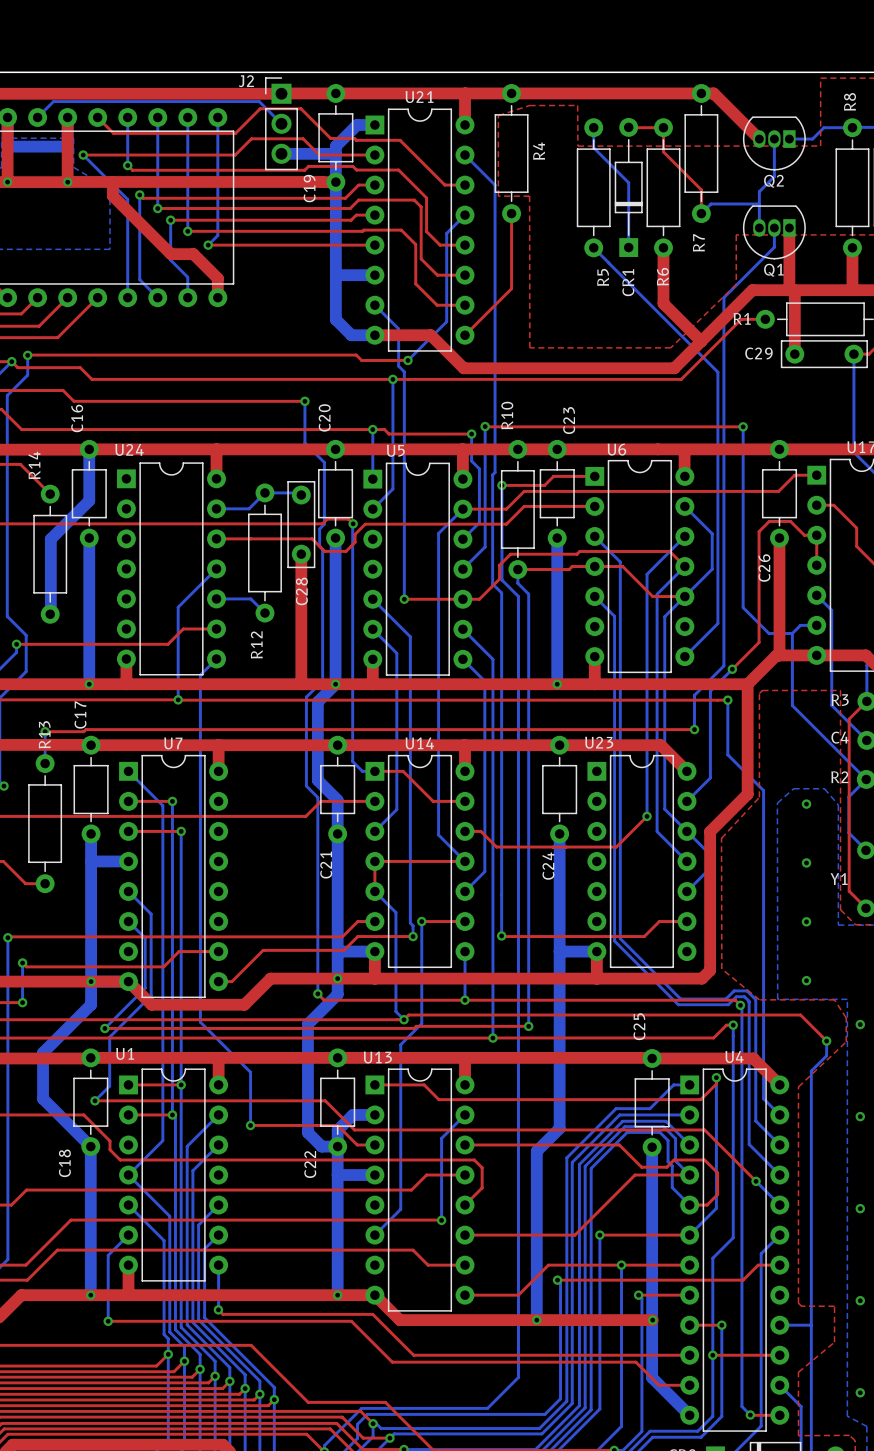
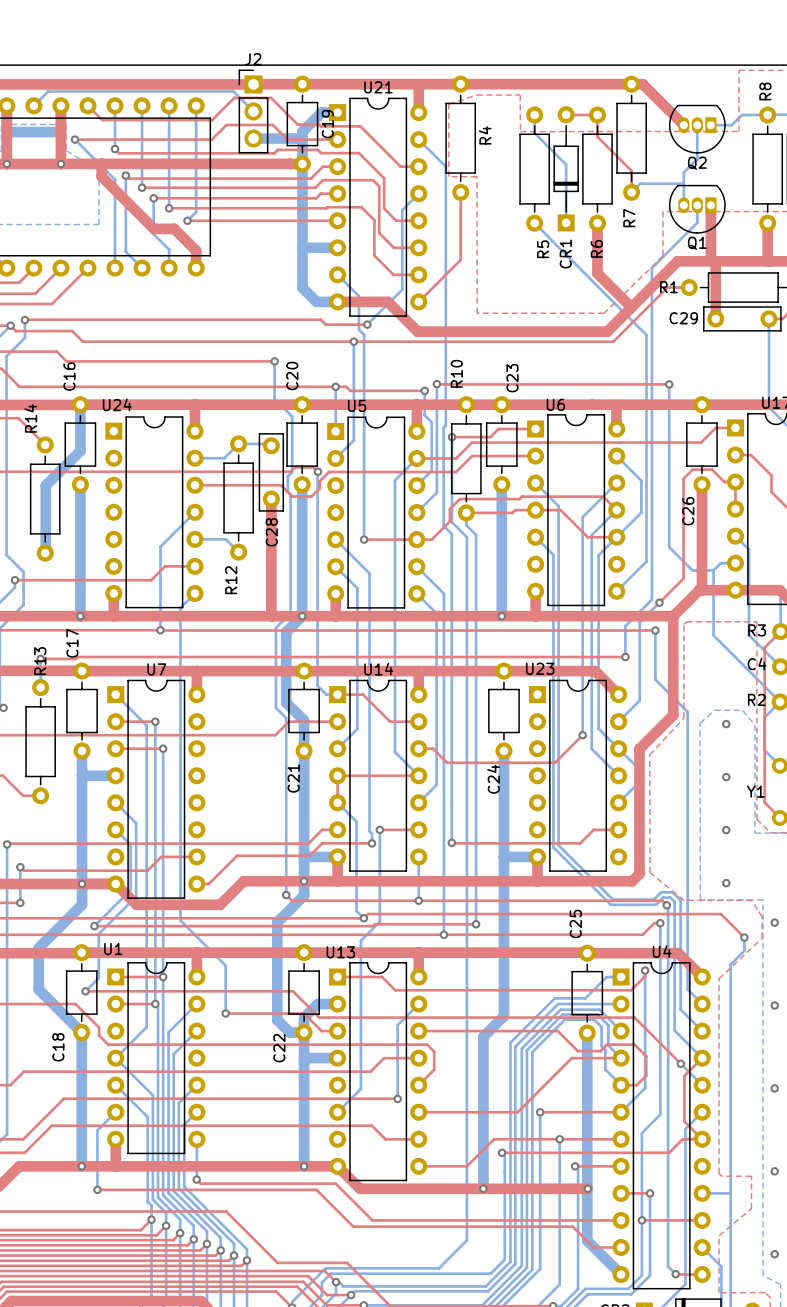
J2 name position: J2 (246, 81) -> J2 (253, 59)
C19 name position: C19 (309, 188) -> C19 (327, 124)
top track: none -> (702, 1058) (684, 1075) (684, 1121) (702, 1139)

